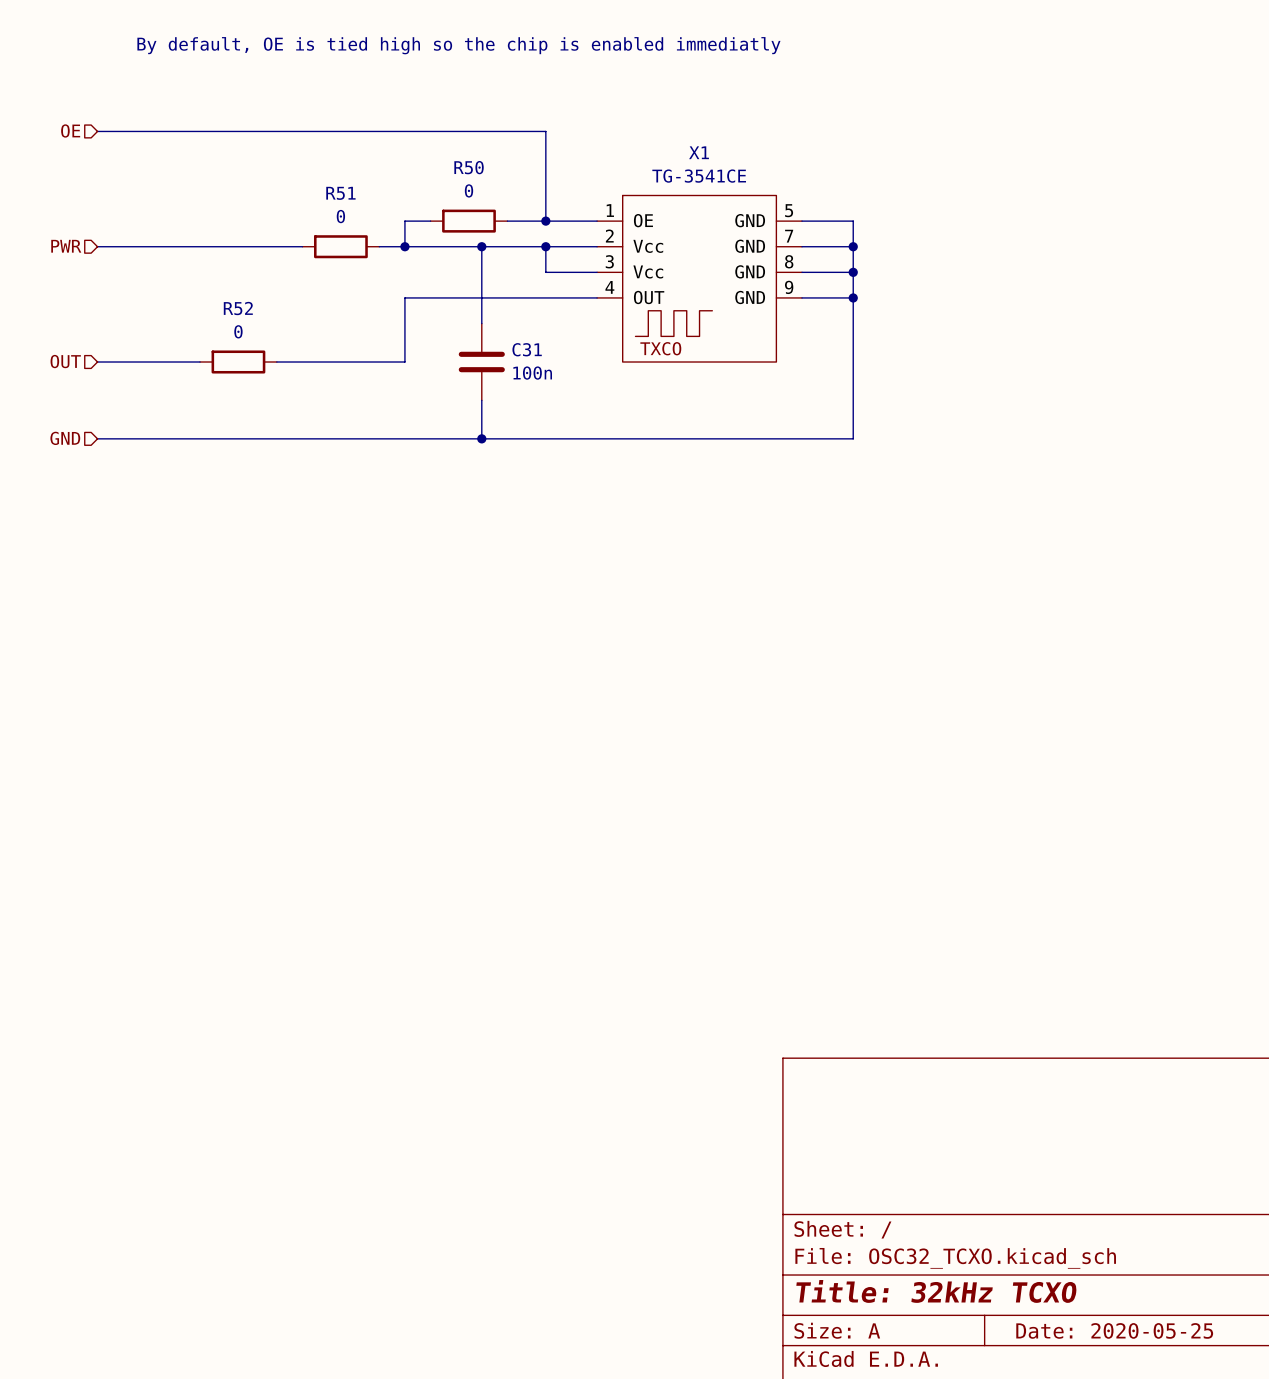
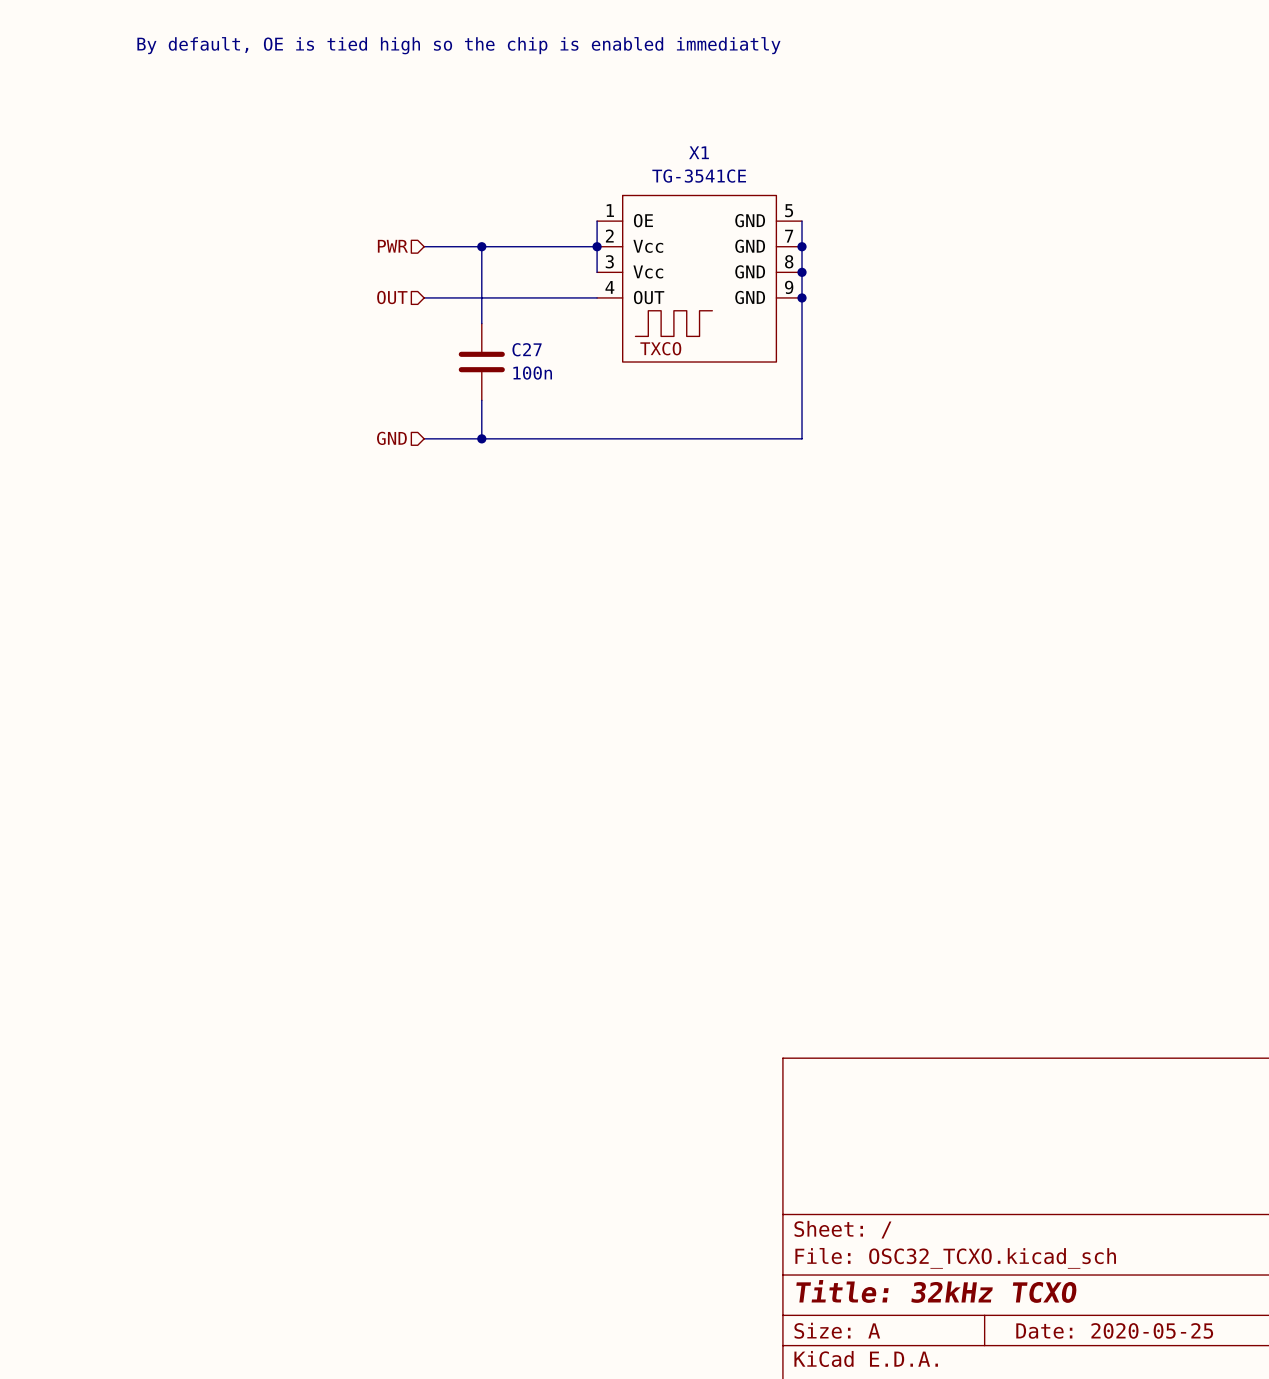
hierarchical label: OE (70, 130) -> none
wire: (97, 131) (545, 131) (545, 221) -> none
wire: (430, 221) (404, 221) (404, 246) -> none
R50: 0 (468, 221) -> none
wire: (507, 221) (597, 221) -> none
junction: (545, 221) -> none
wire: (802, 221) (853, 221) (853, 438) (802, 438) -> (802, 221) (802, 438)
hierarchical label: PWR (66, 246) -> none
wire: (97, 246) (302, 246) -> none
R51: 0 (340, 246) -> none
wire: (379, 246) (424, 246) -> none
hierarchical label: none -> PWR (392, 246)
junction: (404, 246) -> none
wire: (545, 246) (545, 272) (597, 272) -> (597, 221) (597, 272)
junction: (545, 246) -> none
junction: none -> (597, 246)
wire: (802, 246) (853, 246) -> none
junction: none -> (802, 246)
junction: (853, 246) -> none
wire: (802, 272) (853, 272) -> none
junction: none -> (802, 272)
junction: (853, 272) -> none
hierarchical label: none -> OUT (392, 297)
wire: (424, 297) (404, 297) (404, 362) (276, 362) -> none
wire: (802, 297) (853, 297) -> none
junction: none -> (802, 297)
junction: (853, 297) -> none
C31 name: C31 (527, 349) -> C27 (527, 349)
hierarchical label: OUT (65, 361) -> none
wire: (97, 362) (200, 362) -> none
R52: 0 (238, 362) -> none
hierarchical label: GND (65, 438) -> none
wire: (97, 438) (424, 438) -> none
hierarchical label: none -> GND (391, 438)

